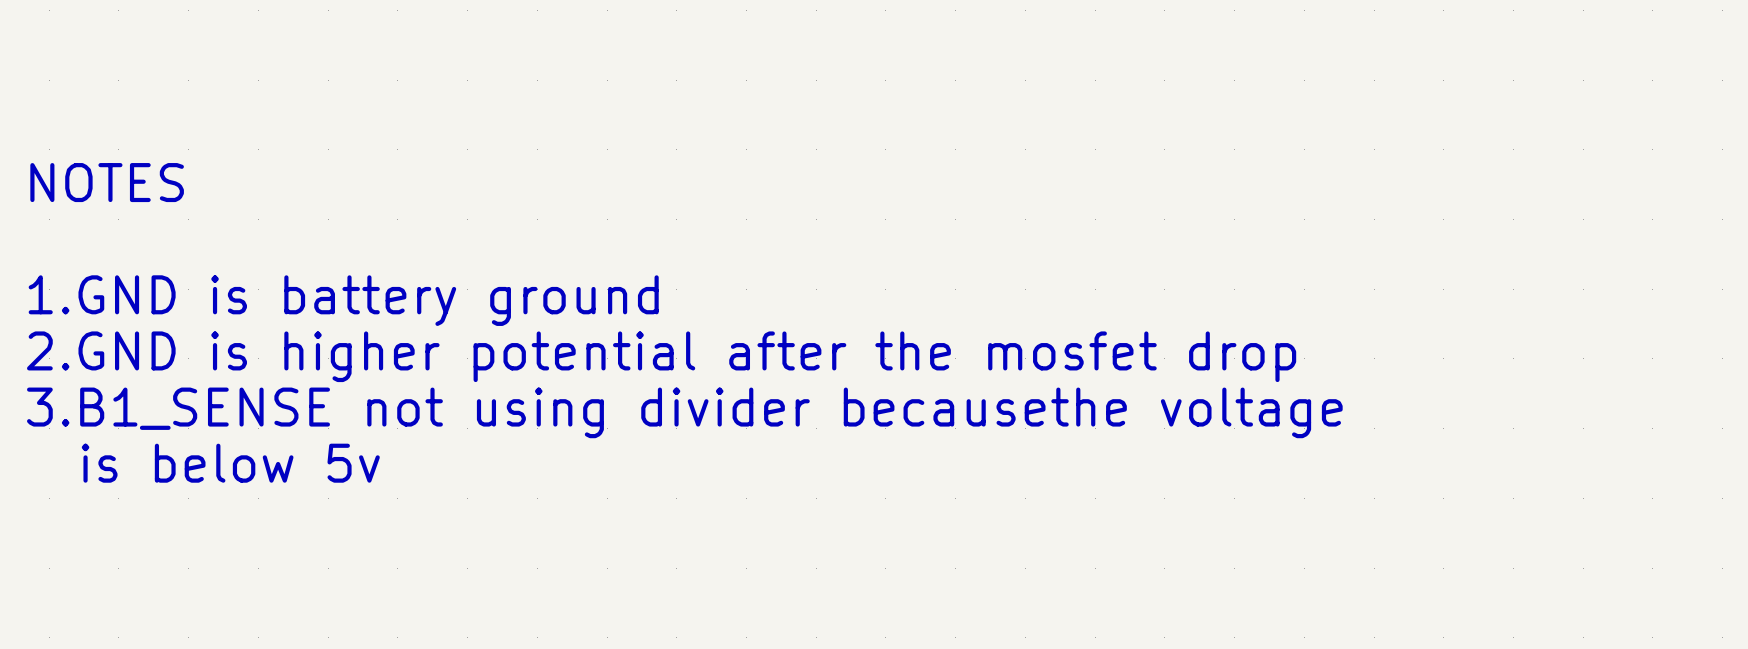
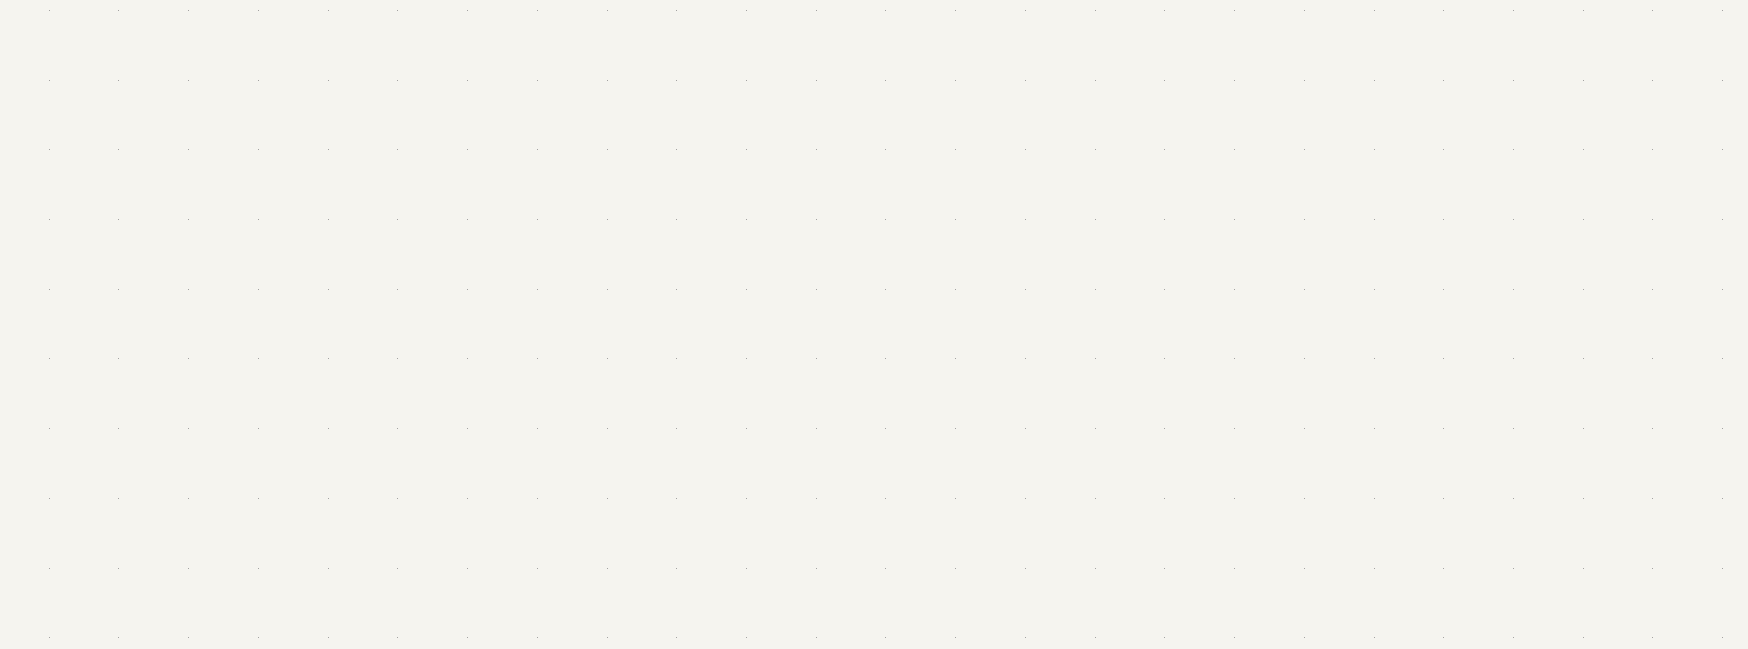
text: NOTES (107, 182) -> none
text: 1.GND is battery ground (343, 300) -> none
text: 2.GND is higher potential after the mosfet drop (661, 356) -> none
text: 3.B1_SENSE not using divider becausethe voltage (684, 412) -> none
text: is below 5v (230, 463) -> none

